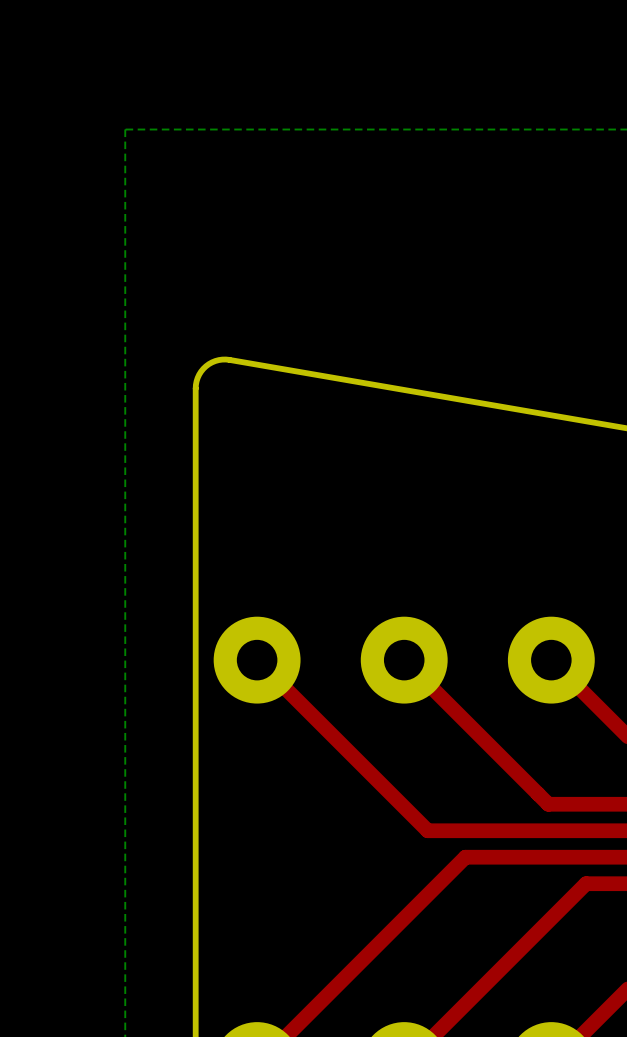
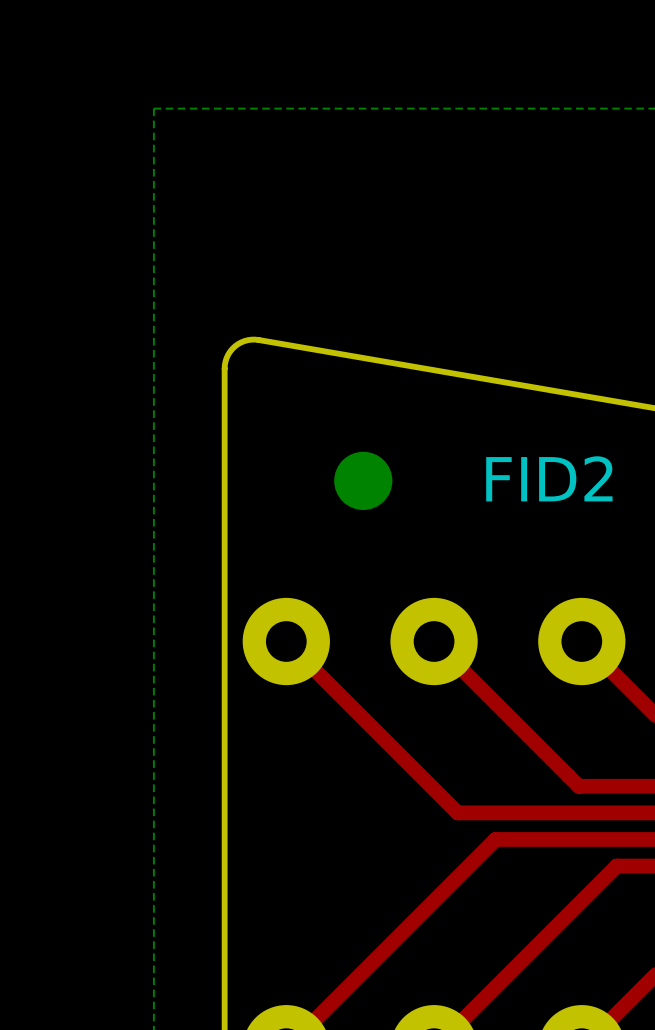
FID2: none -> (363, 480)

